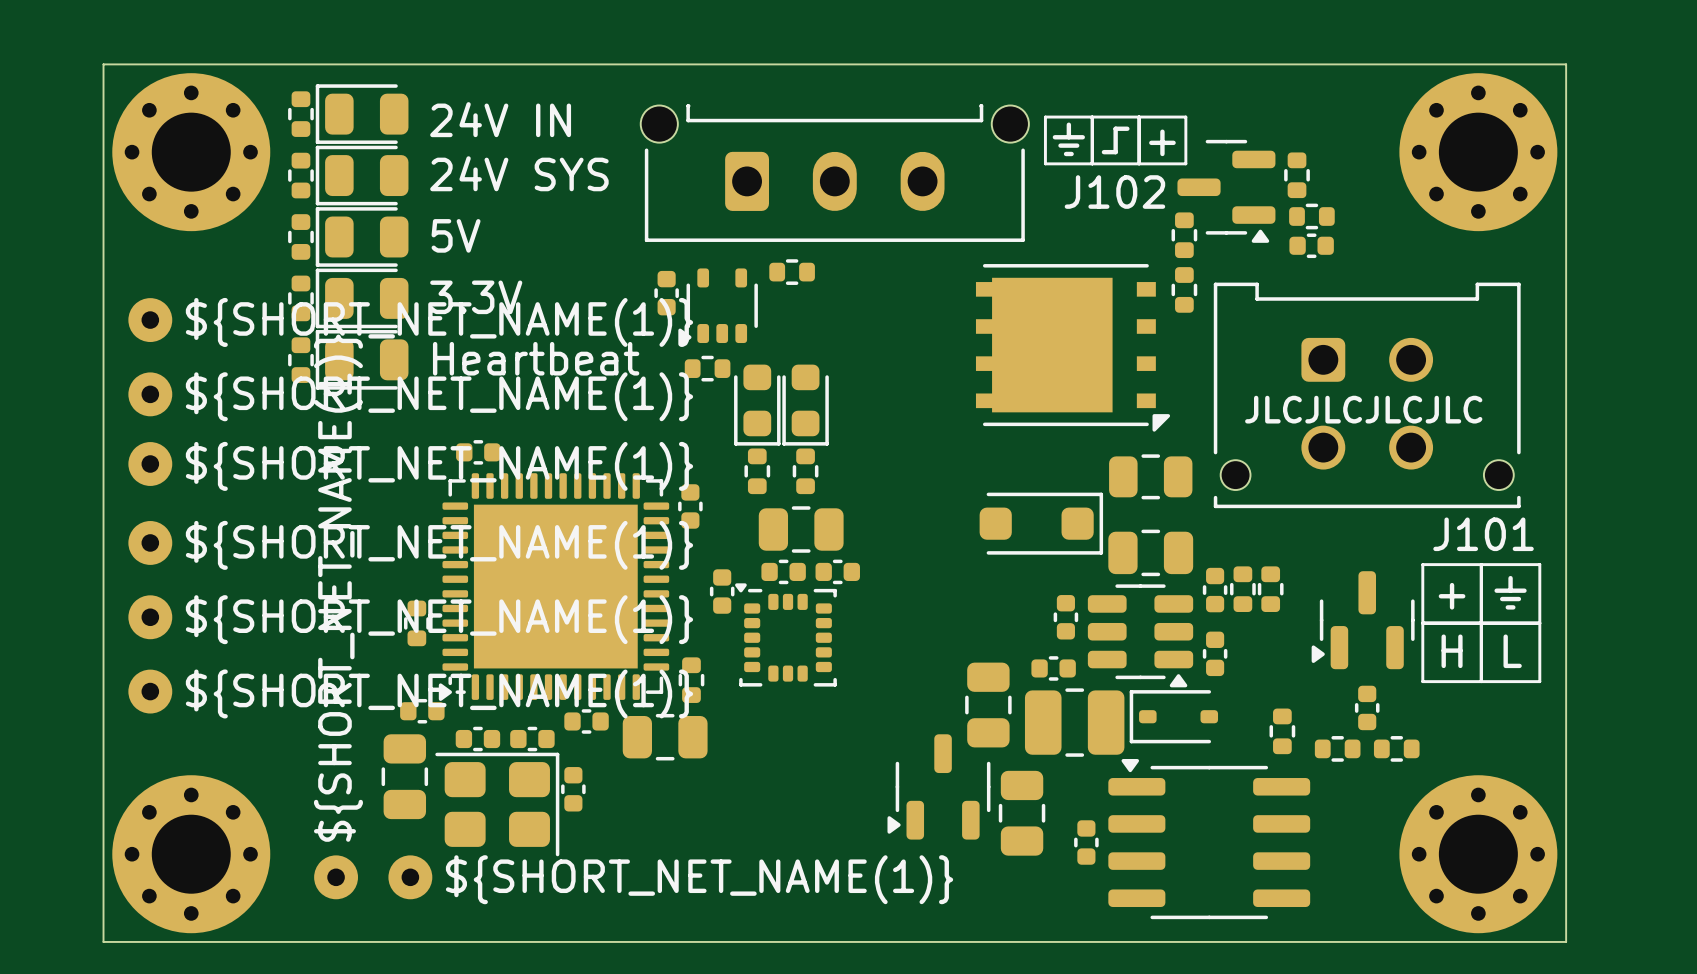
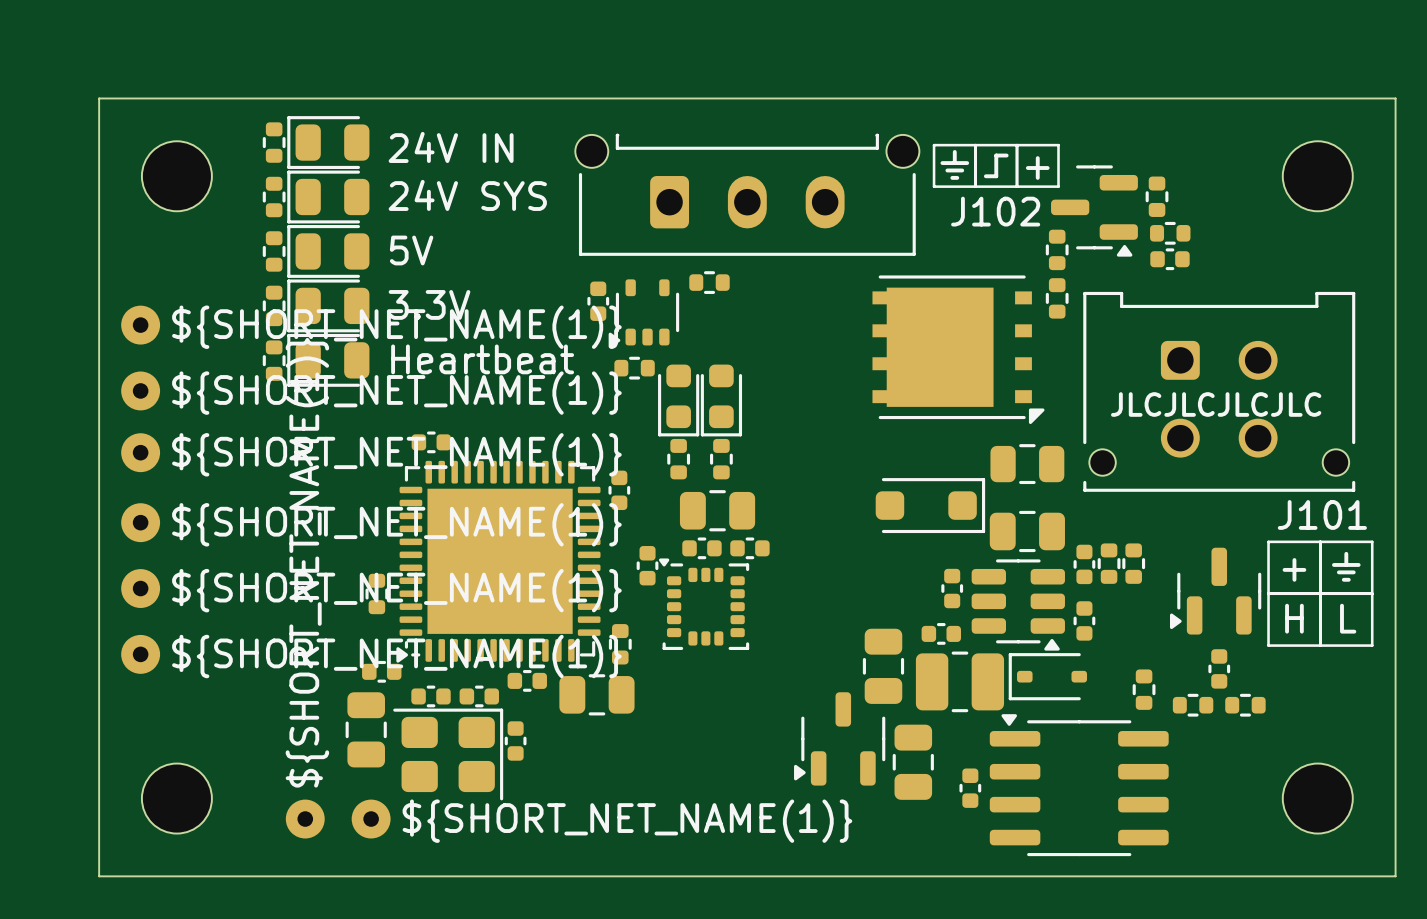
part footprint: [112, 73, 271, 232] -> [141, 141, 212, 212]
part footprint: [1399, 73, 1558, 232] -> [1282, 141, 1353, 212]
part footprint: [112, 775, 271, 934] -> [141, 763, 212, 834]
part footprint: [1399, 775, 1558, 934] -> [1282, 763, 1353, 834]

